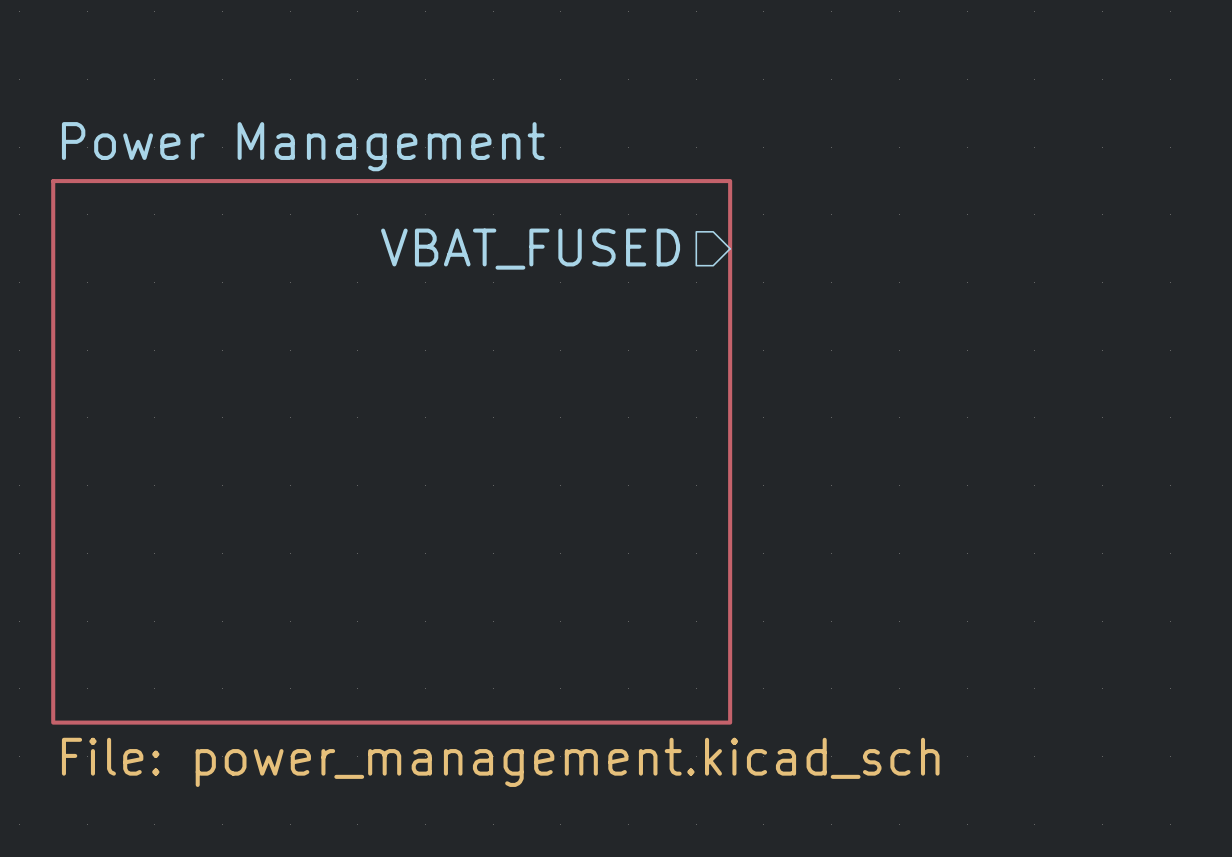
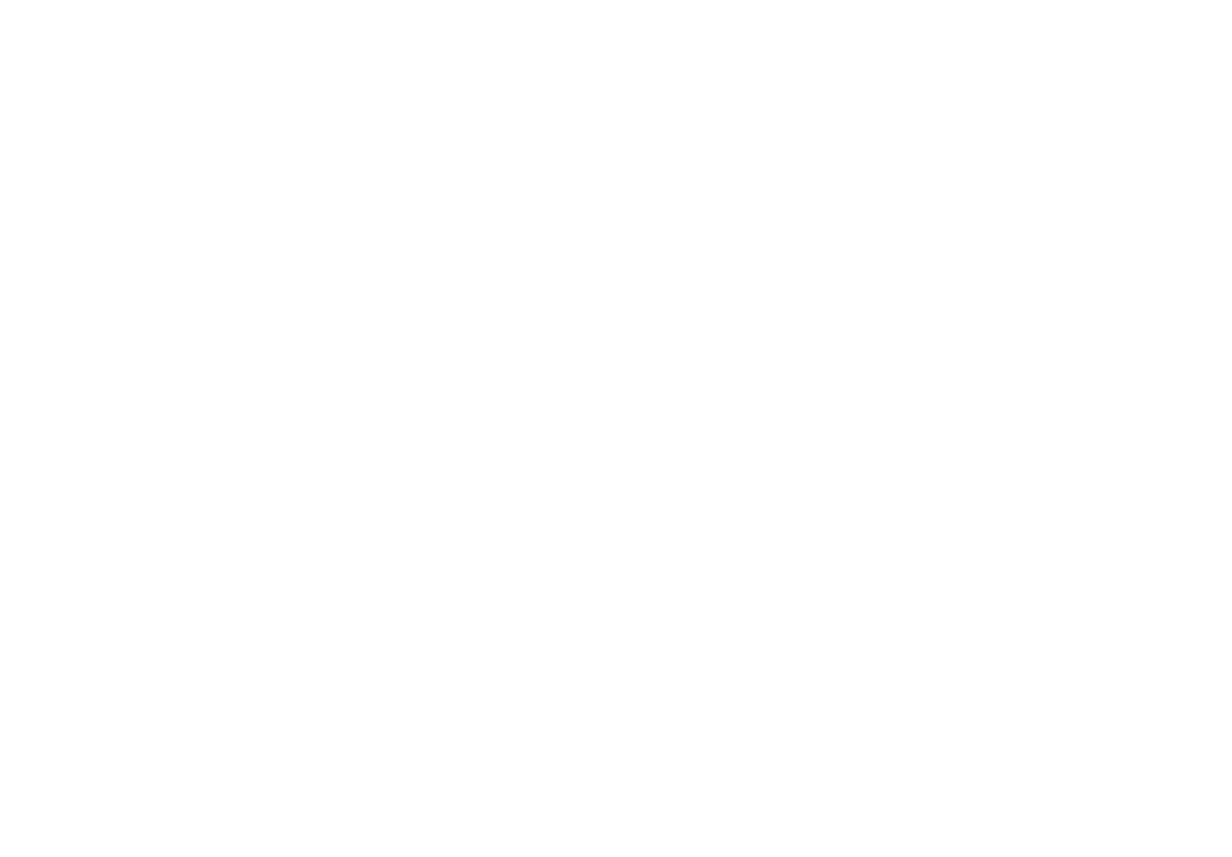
sheet pin: VBAT_FUSED (530, 249) -> none
sheet Power Management: File: power_management.kicad_sch (391, 451) -> none

